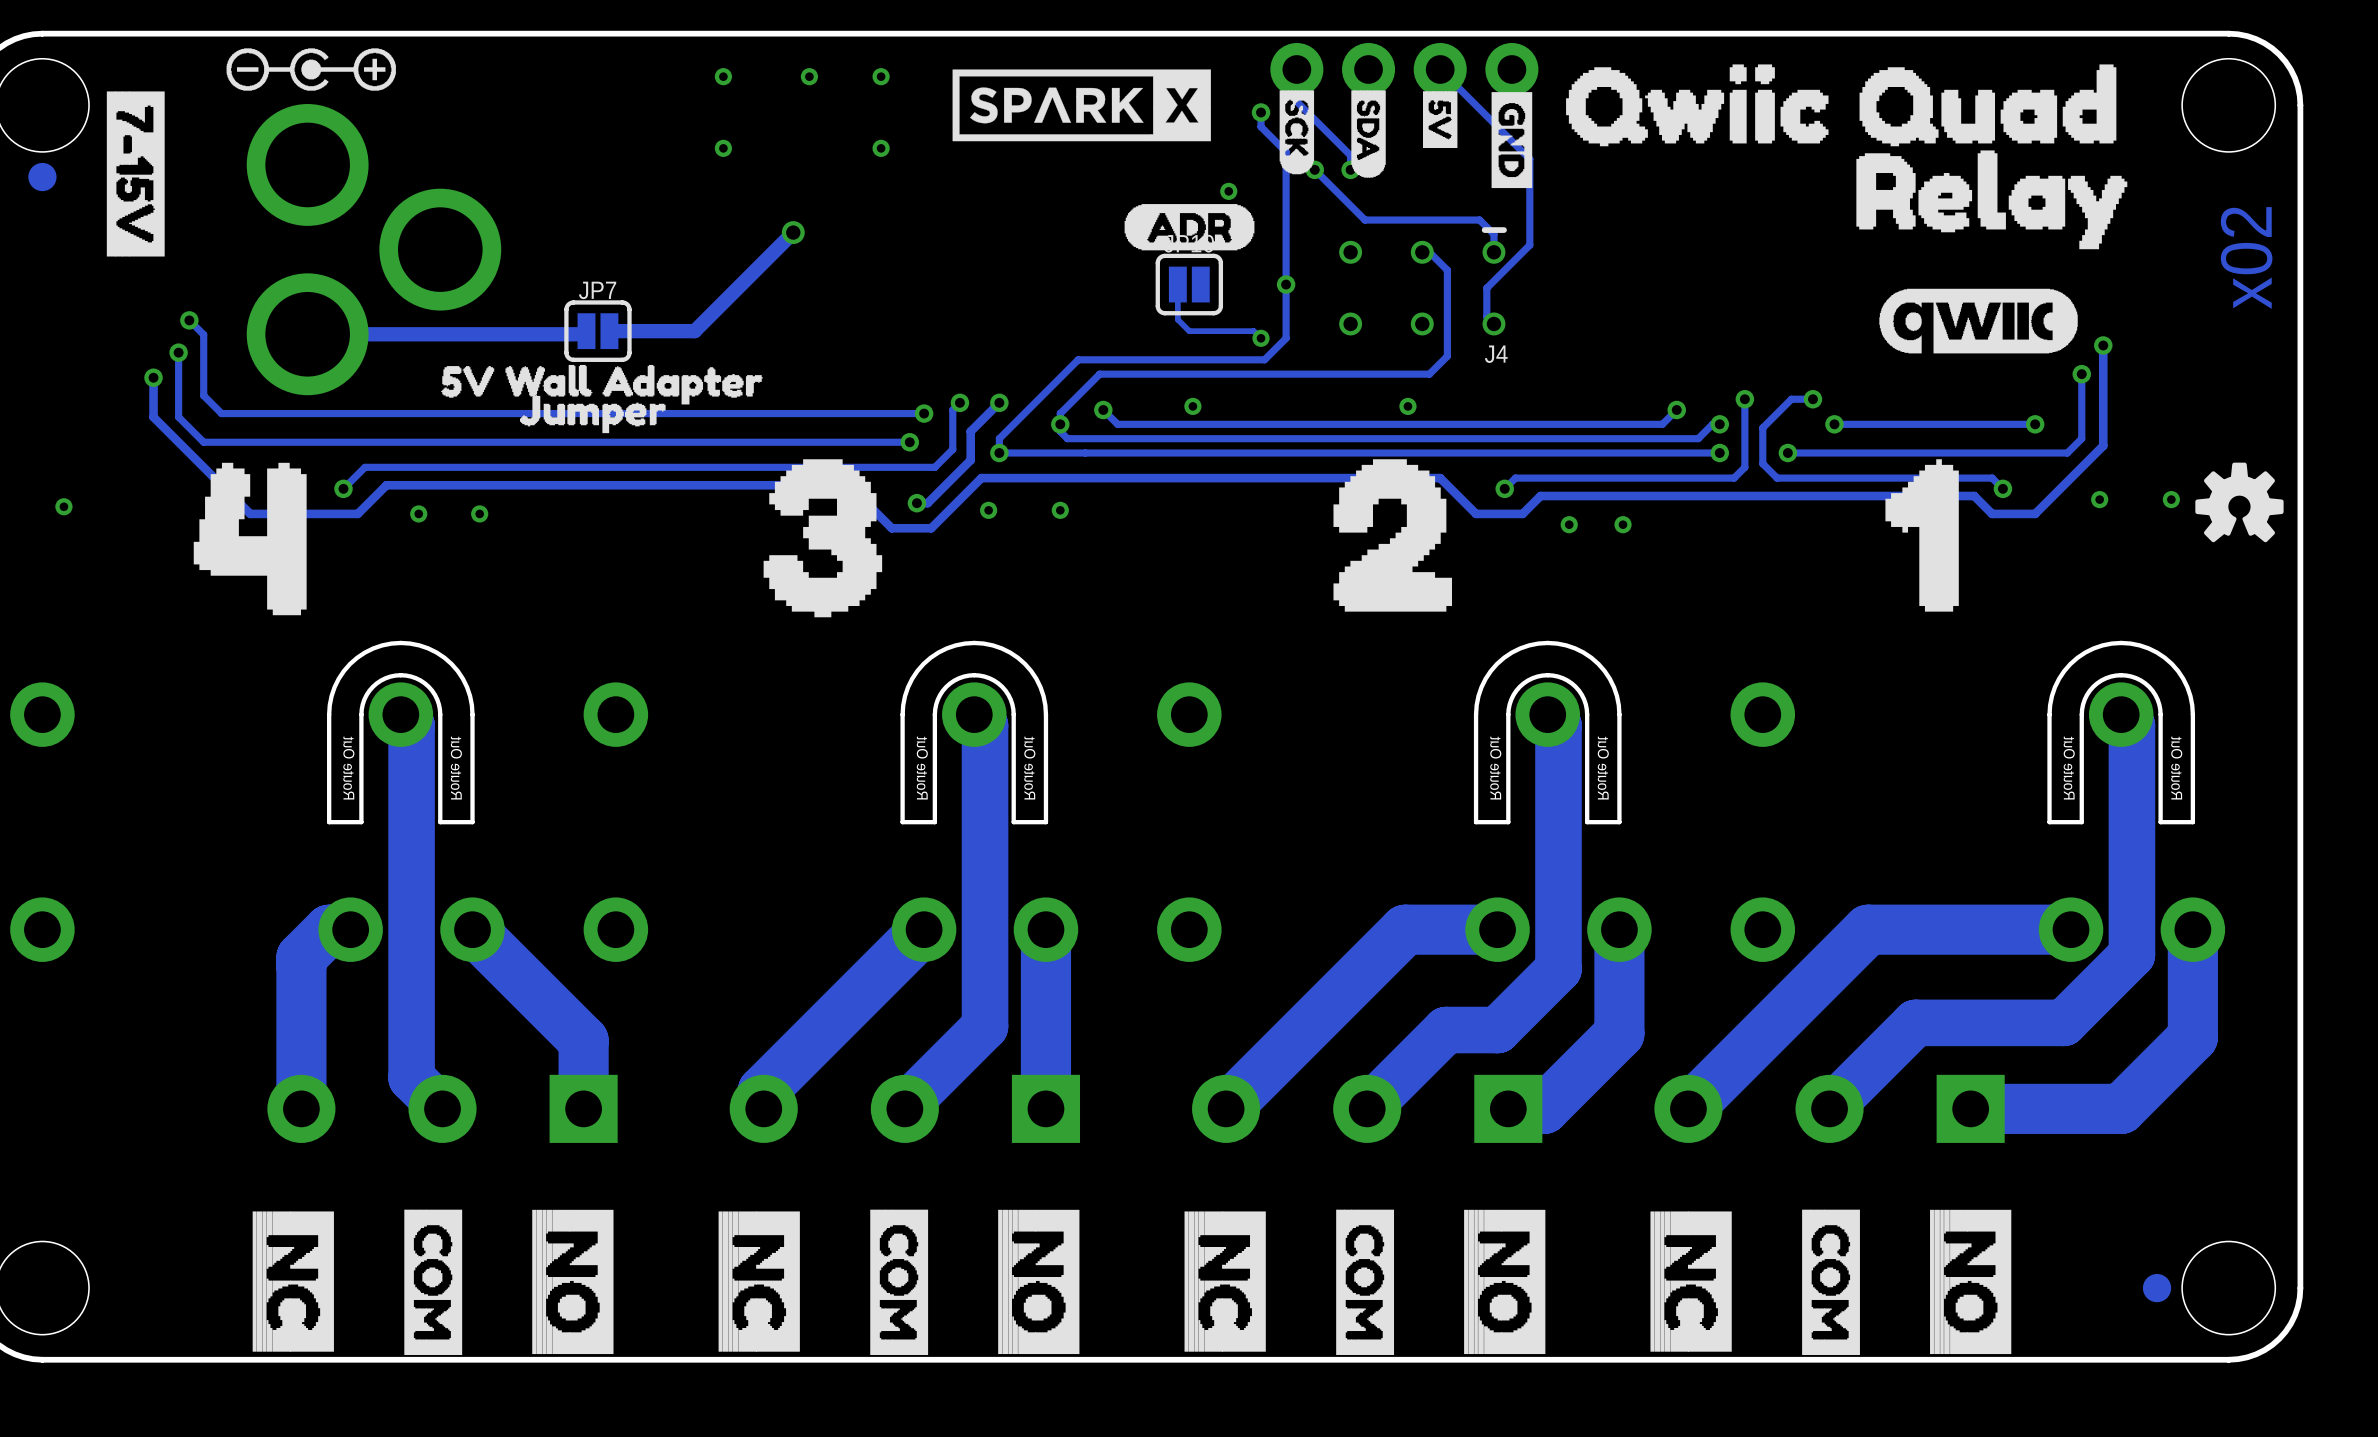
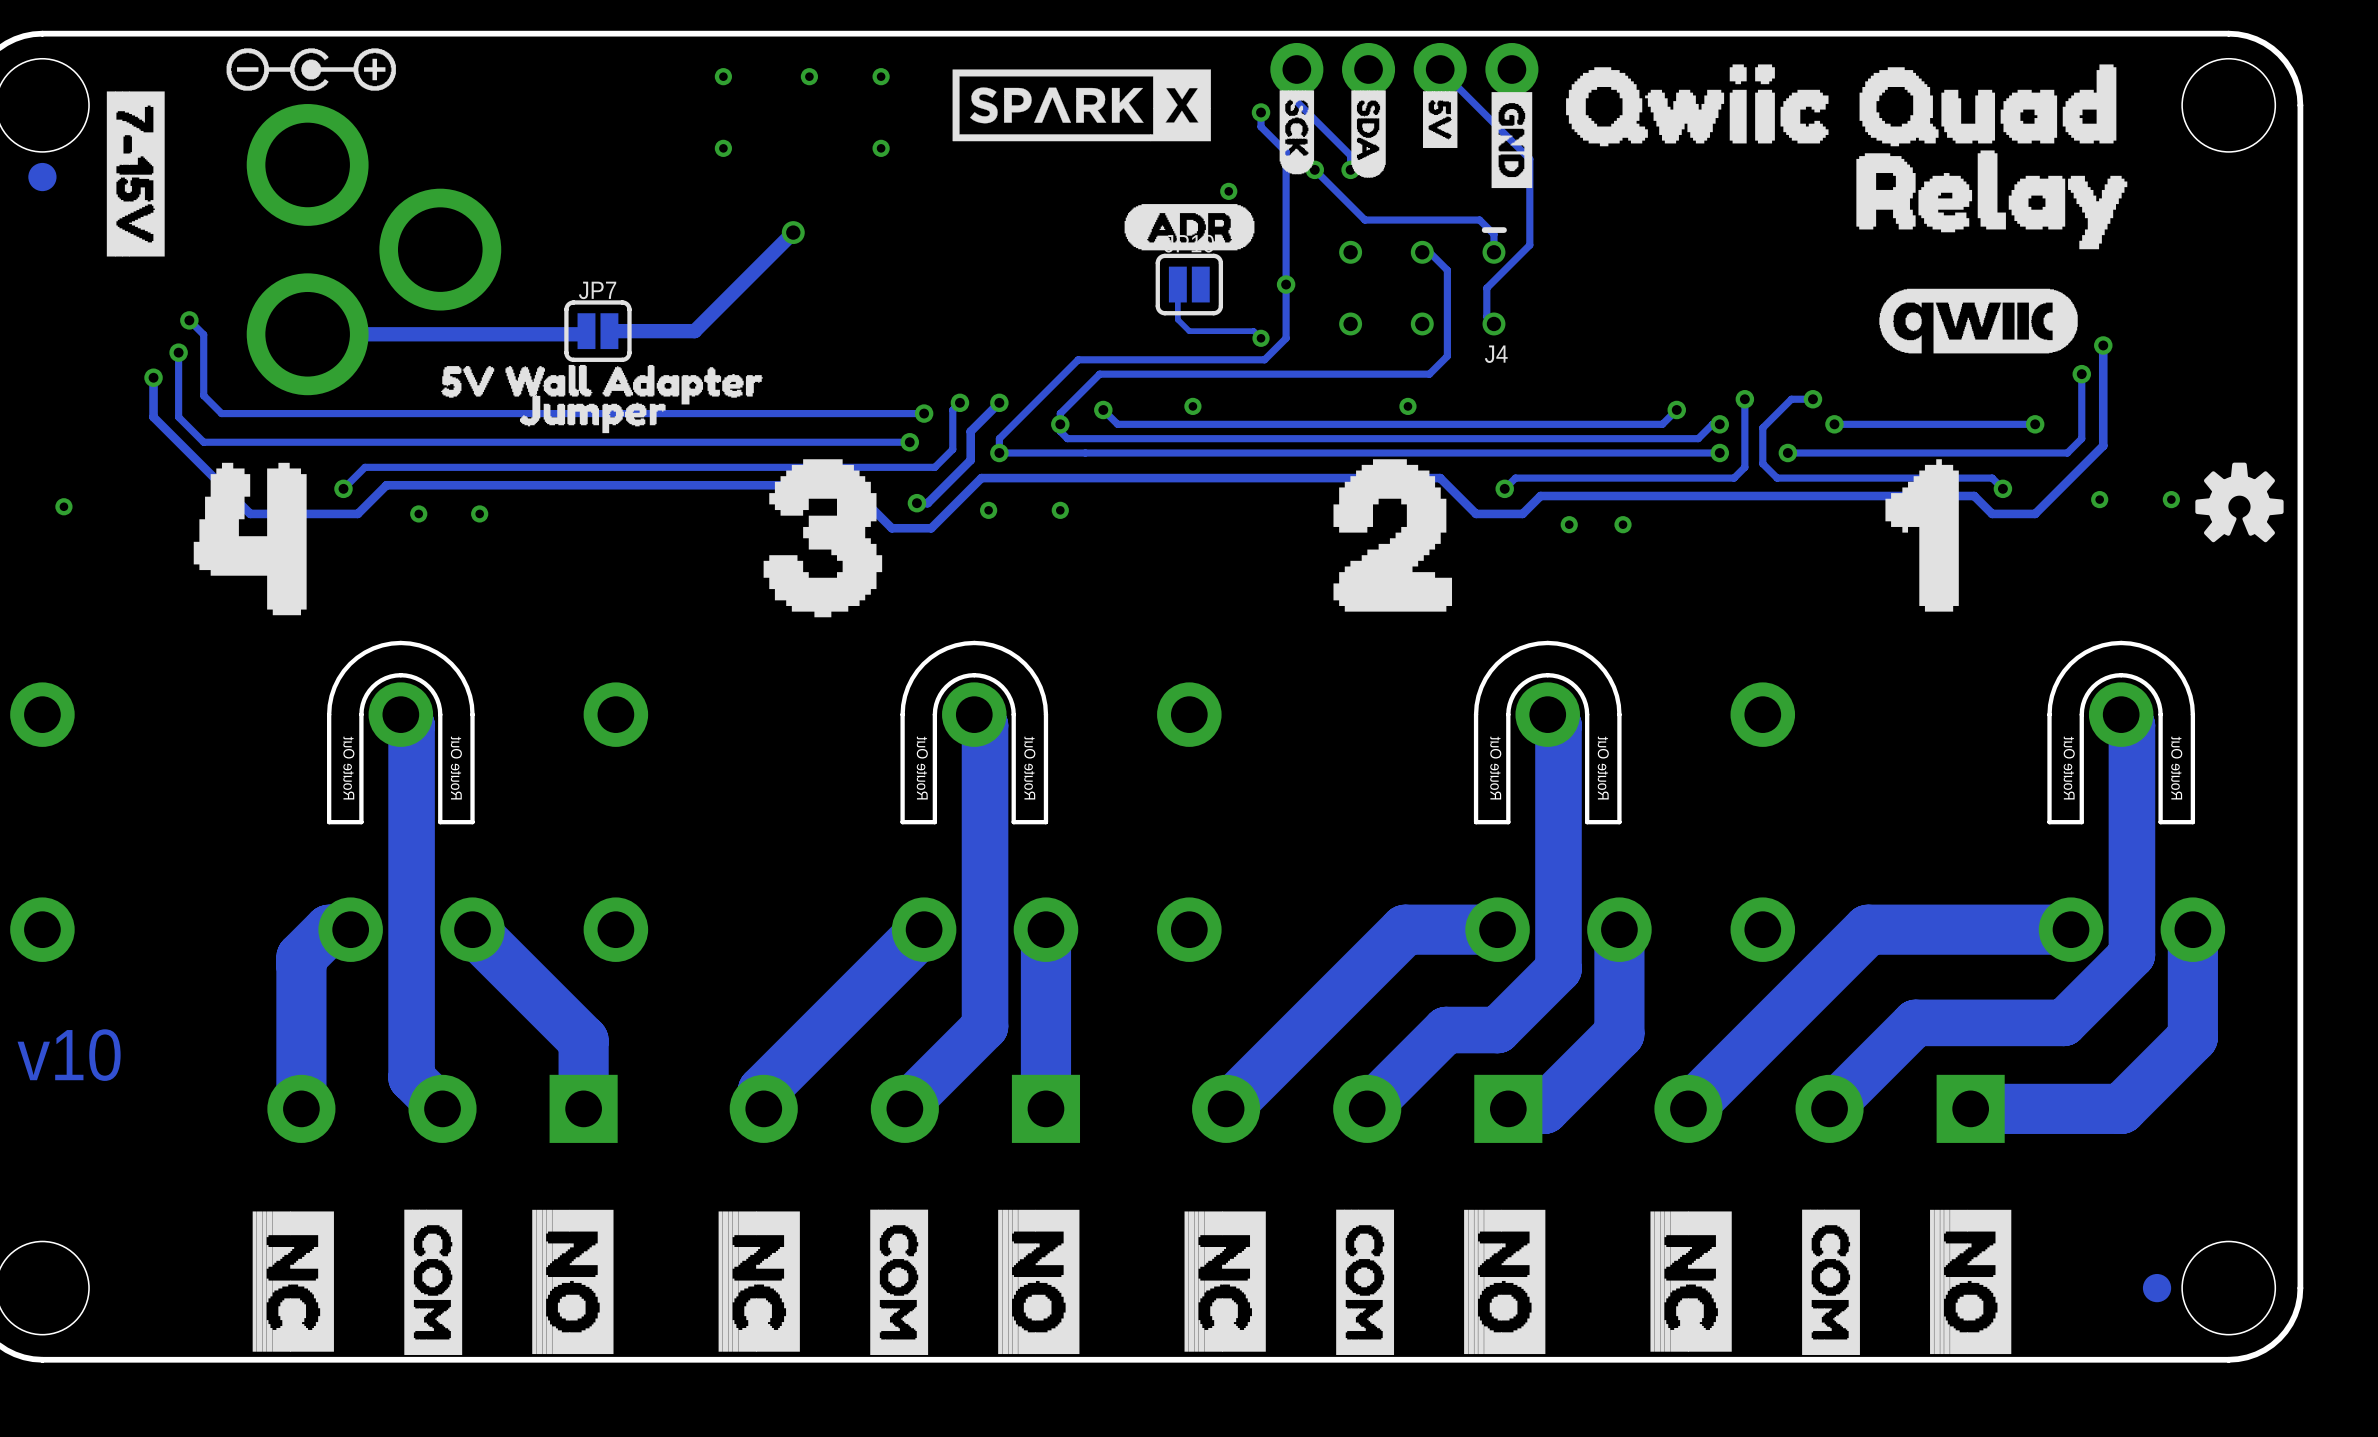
text: x02 (2246, 258) -> none
text: none -> v10 (69, 1055)

